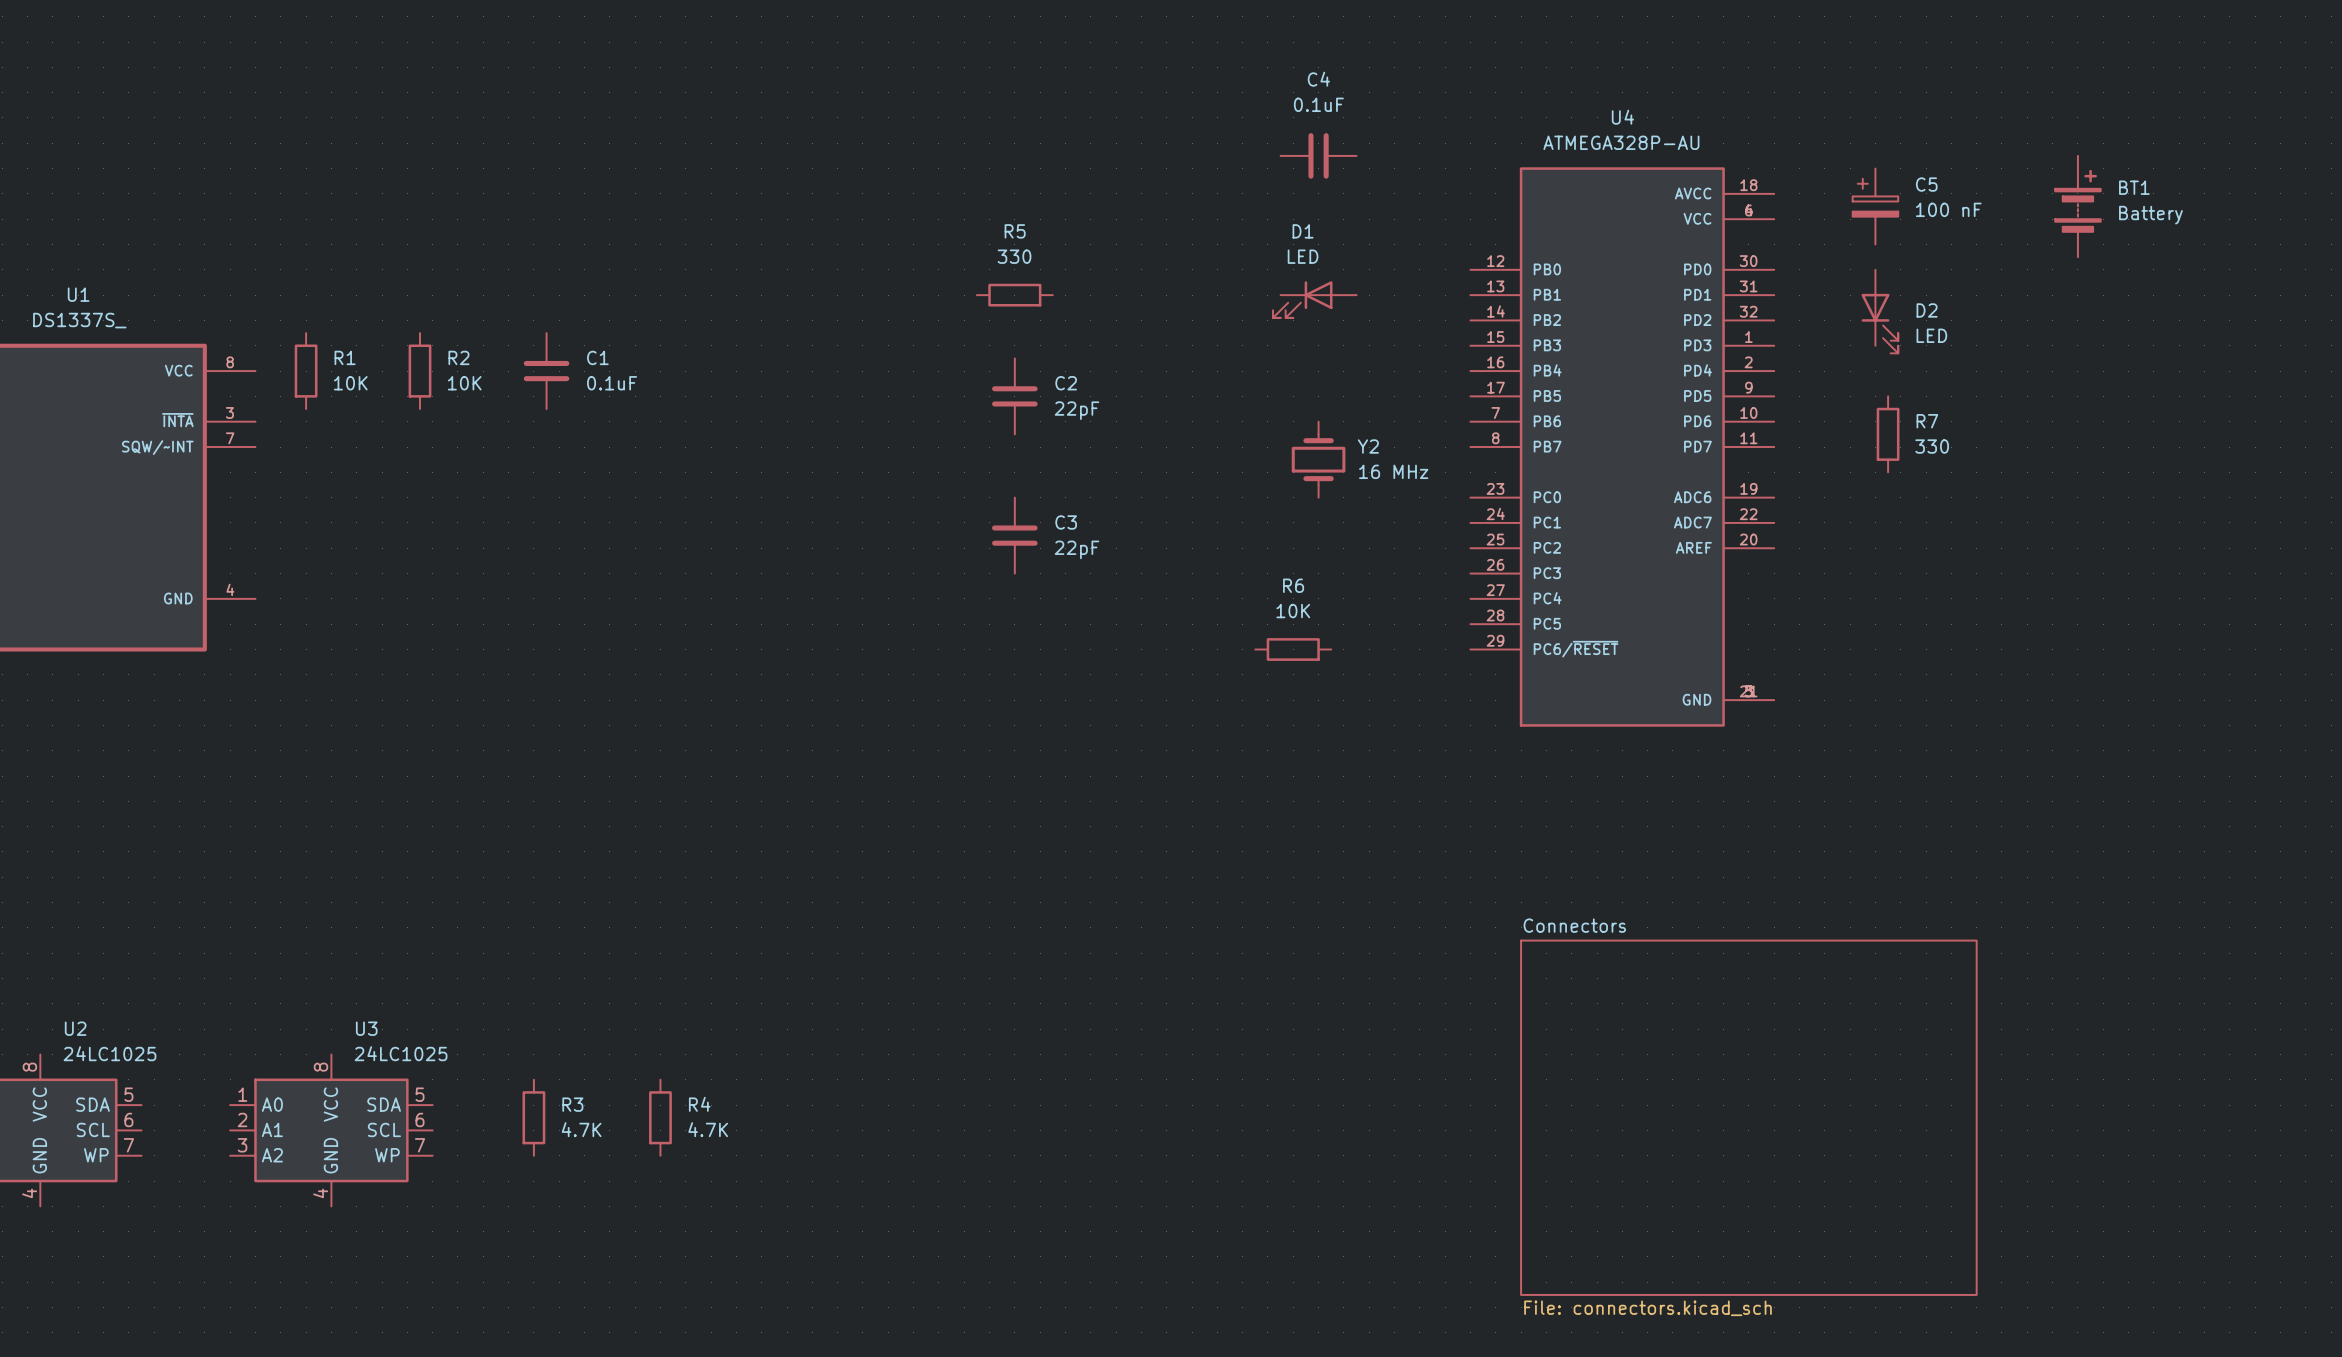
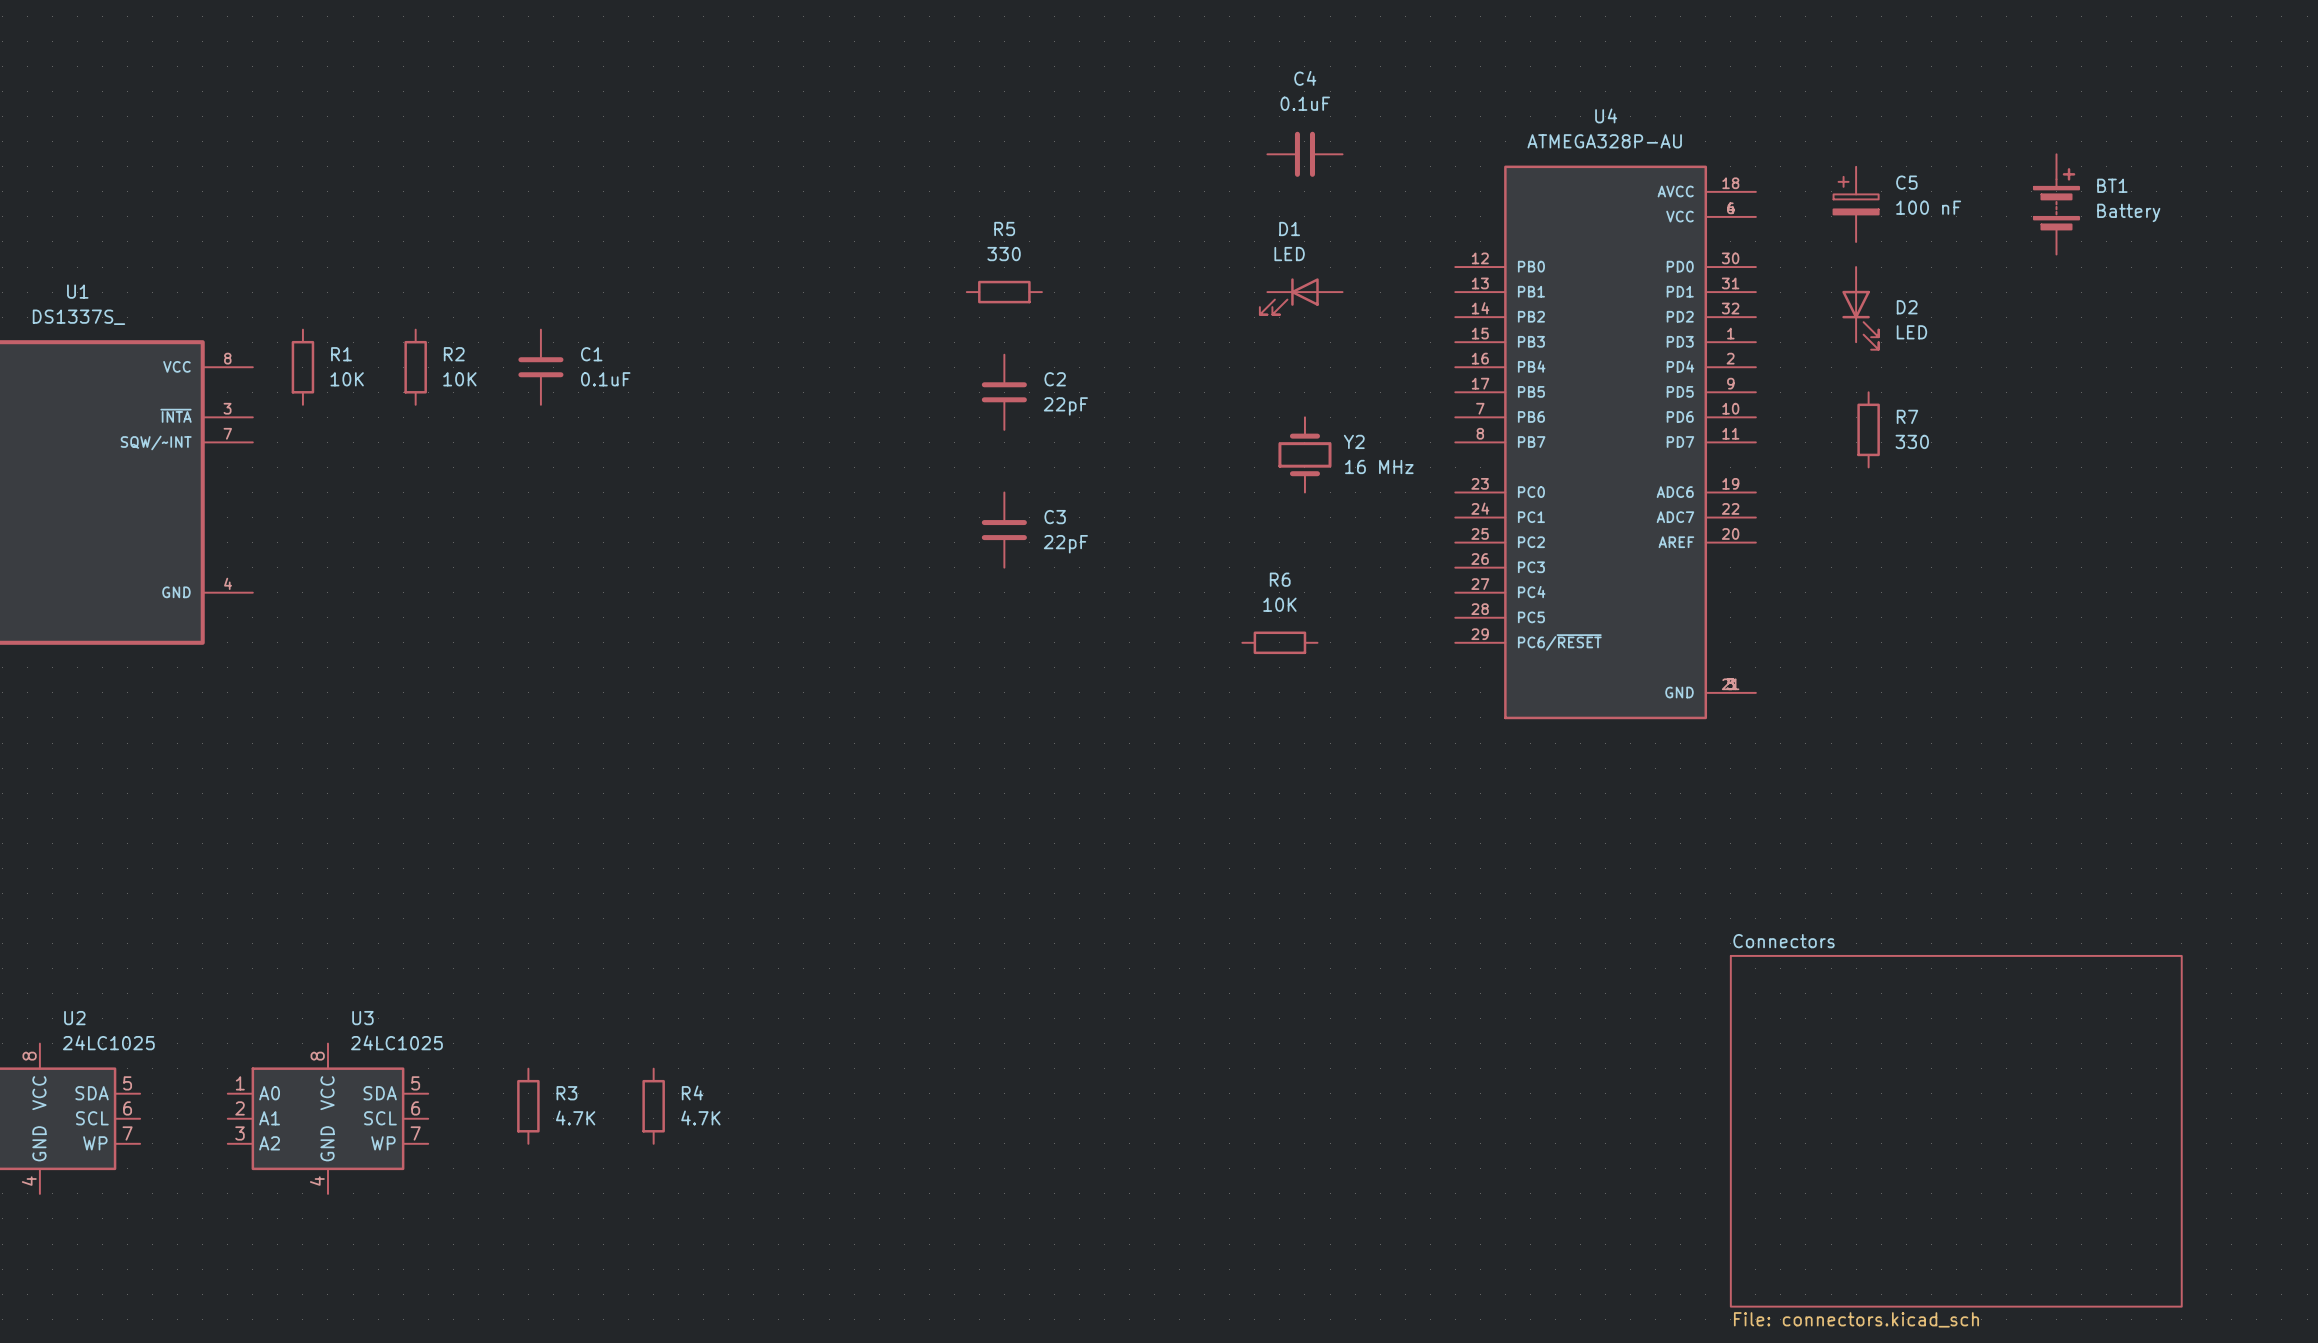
sheet Connectors position: (1748, 1117) -> (1956, 1131)

